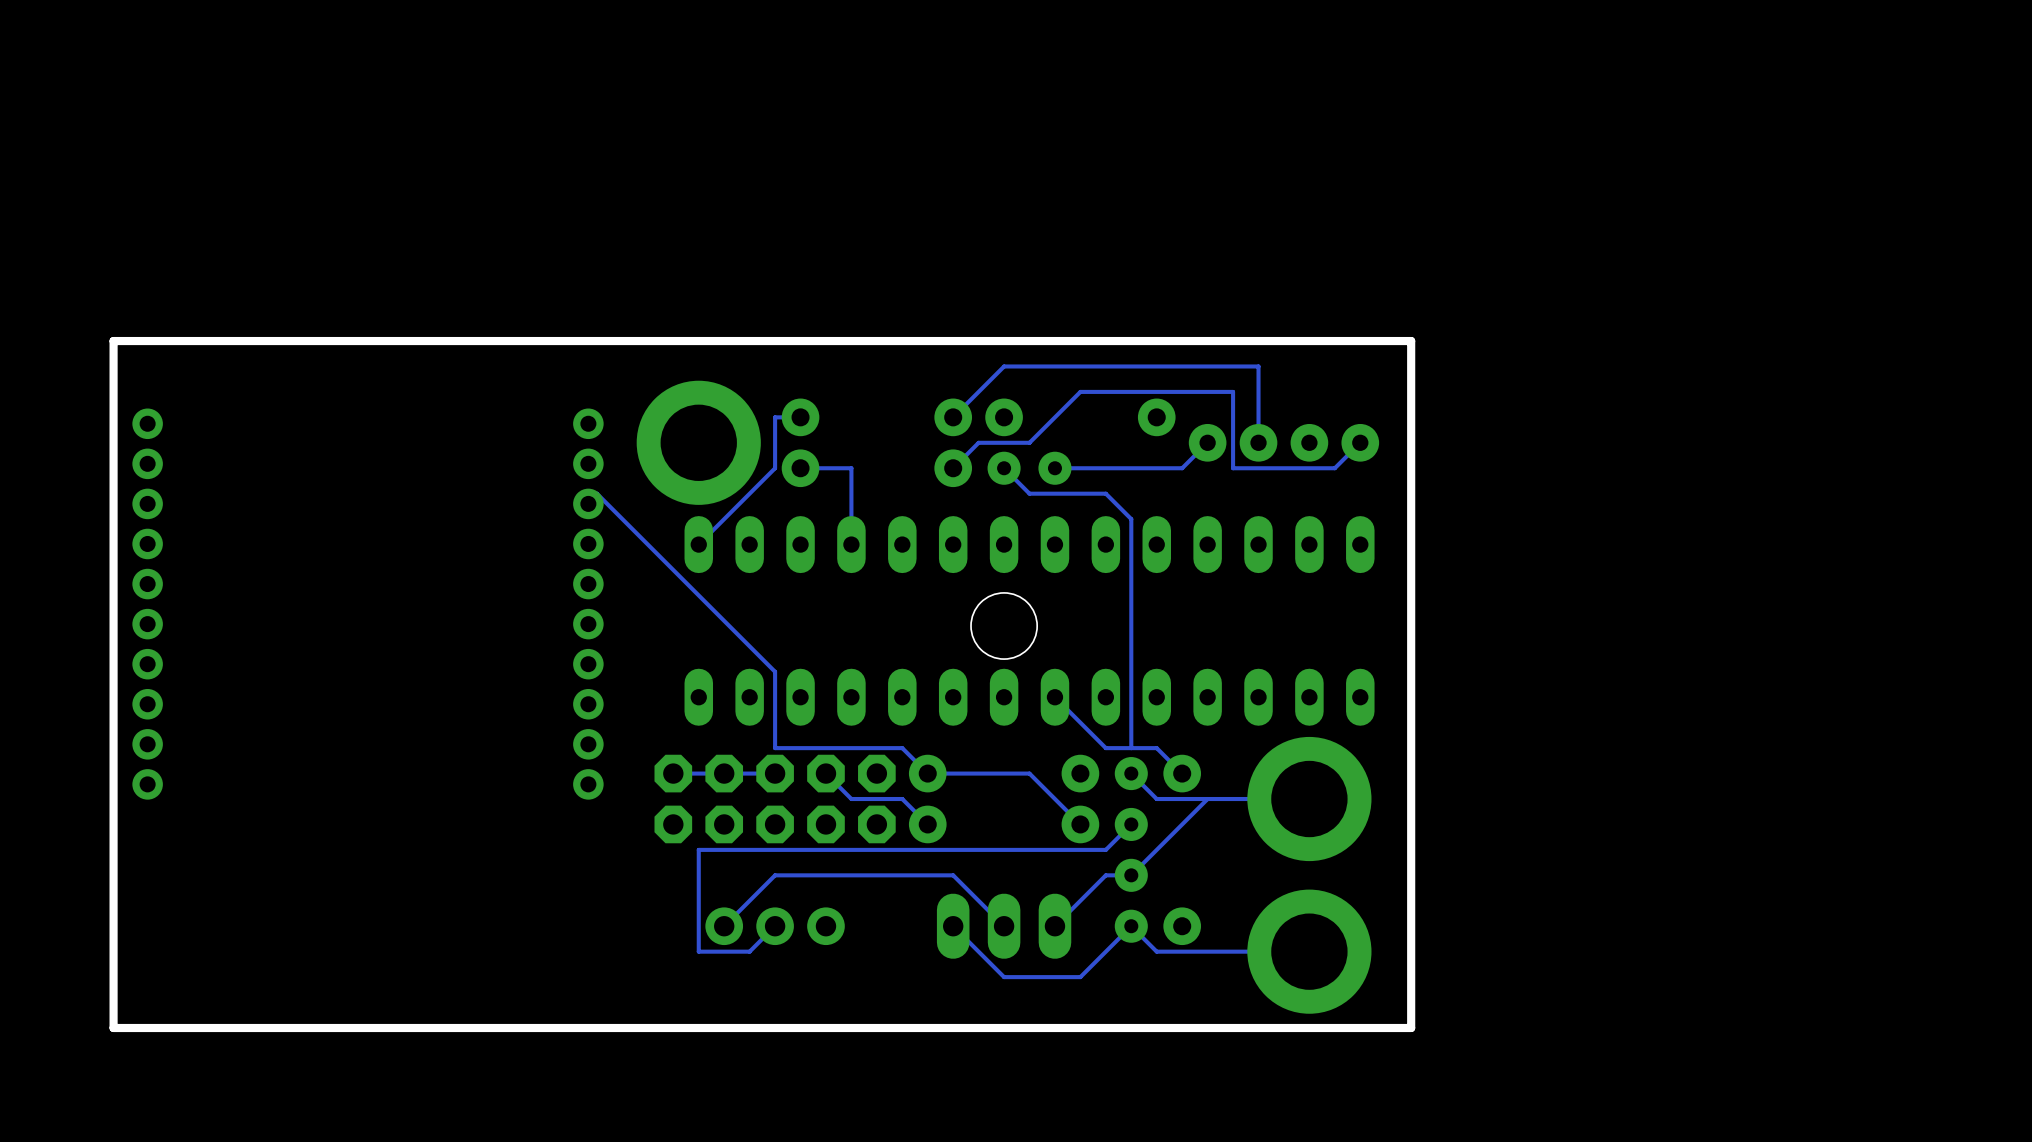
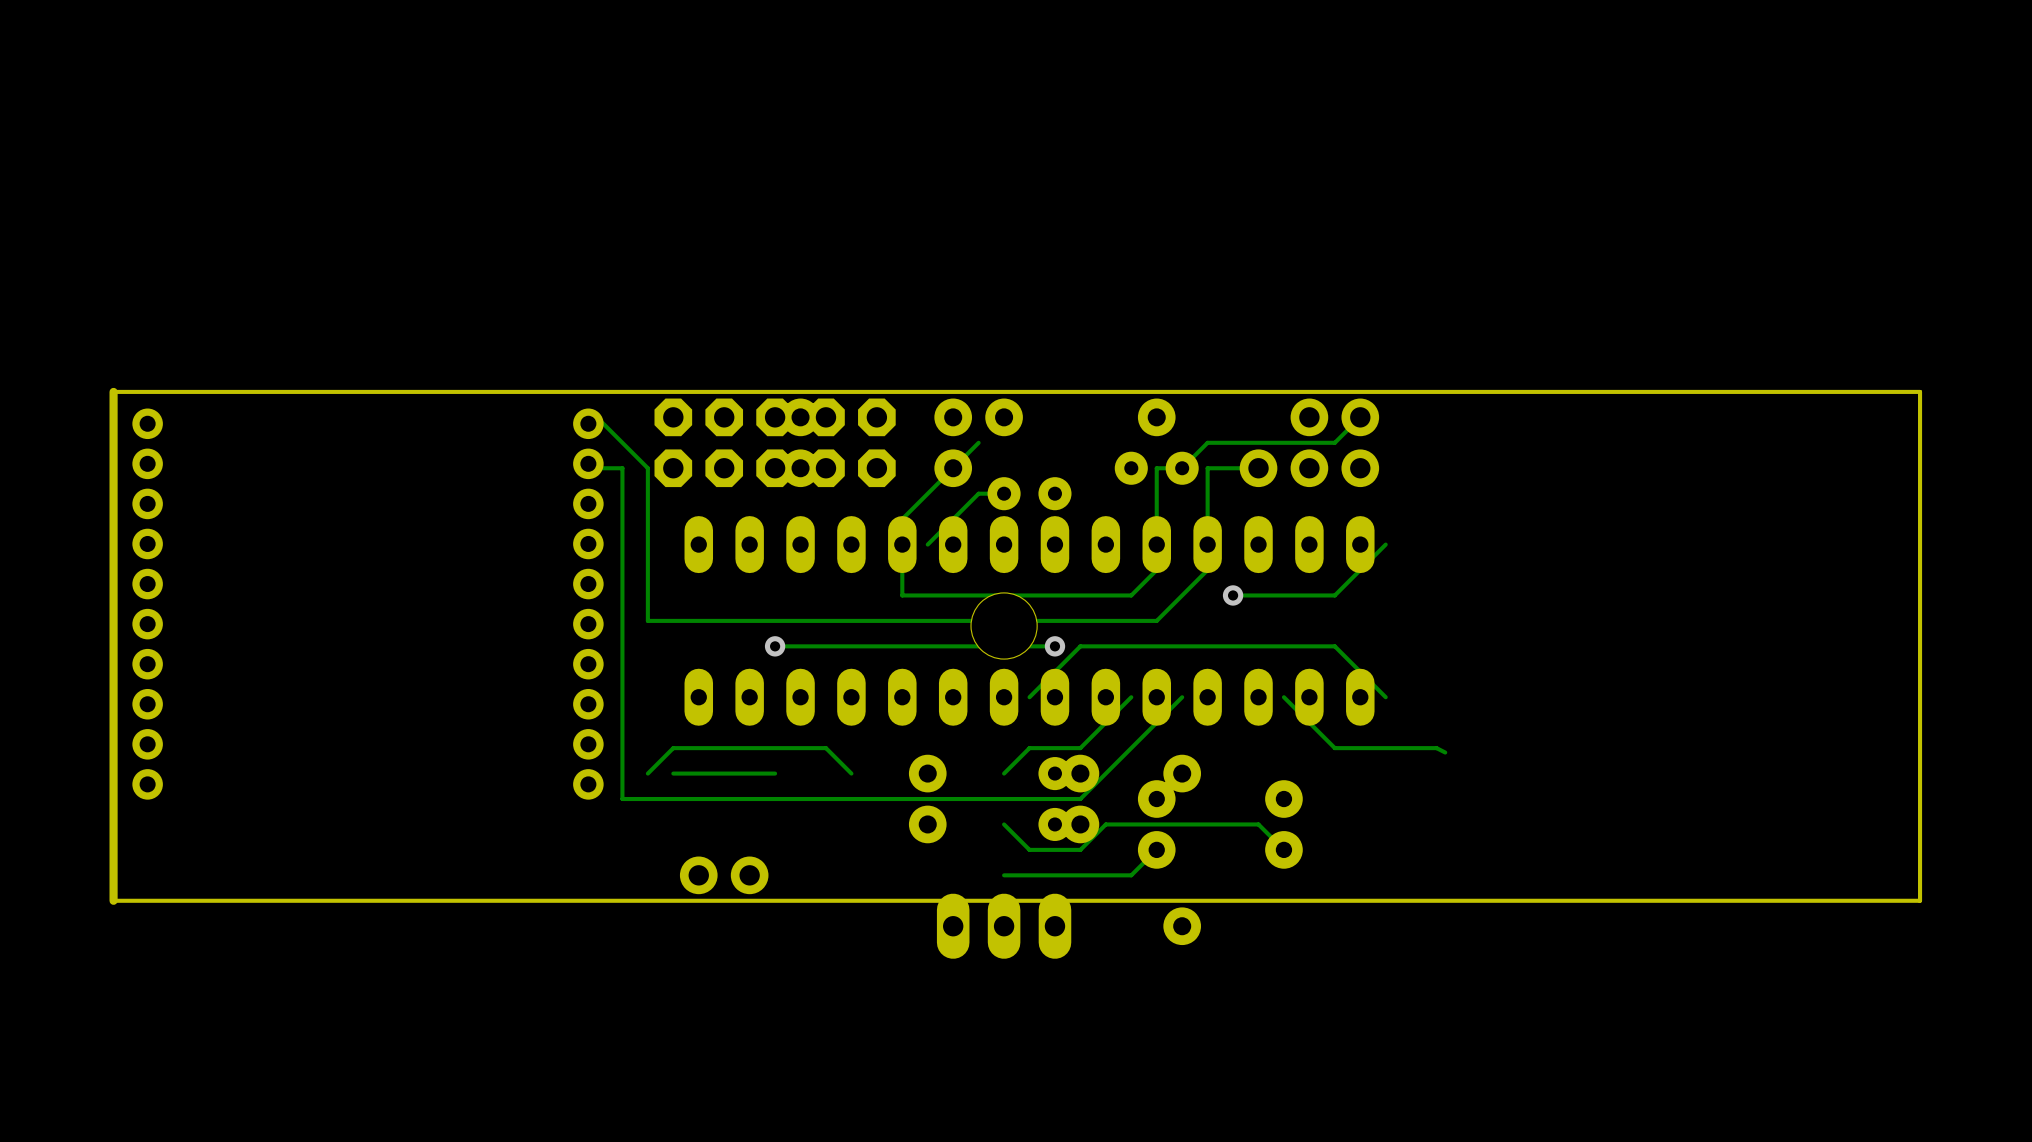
board edge: (113, 391) (113, 341) (1411, 341) (1411, 1028) (113, 1028) (113, 900) -> (113, 391) (1920, 391) (1920, 900) (113, 900)
track: (800, 417) (775, 417) (775, 468) (698, 544) -> none
track: (953, 417) (1004, 366) (1258, 366) (1258, 442) -> none
part: none -> (1309, 417)
track: none -> (1360, 417) (1334, 442) (1207, 442)
part: none -> (1360, 417)
part: (698, 442) -> none
track: (978, 442) (1029, 442) (1080, 391) (1233, 391) (1233, 468) -> (588, 423) (596, 417) (647, 468) (647, 620) (1156, 620) (1207, 570) (1207, 468) (1233, 468)
part: (1233, 442) -> none
part: (1334, 442) -> none
track: (1360, 442) (1334, 468) (1258, 468) -> none
track: (800, 468) (851, 468) (851, 544) -> none
track: (1004, 468) (1029, 493) (1105, 493) (1131, 519) (1131, 748) -> none
part position: (1029, 468) -> (1029, 493)
track: (1156, 468) (1054, 468) -> (1156, 468) (1156, 570) (1131, 595) (902, 595) (902, 519) (953, 468)
part: none -> (1156, 468)
part: none -> (1309, 468)
track: none -> (1004, 493) (978, 493) (927, 544)
track: (588, 503) (596, 493) (775, 671) (775, 748) -> (647, 773) (673, 748) (775, 748)
track: none -> (1385, 544) (1334, 595) (1233, 595)
via: none -> (1233, 595)
via: none -> (775, 646)
track: none -> (1054, 646) (775, 646)
via: none -> (1054, 646)
track: (1054, 697) (1105, 748) (1156, 748) (1182, 773) -> none
track: none -> (1131, 697) (1080, 748) (1029, 748) (1004, 773)
track: none -> (1283, 697) (1334, 748) (1436, 748) (1445, 752)
track: none -> (1385, 697) (1334, 646) (1080, 646) (1029, 697)
track: (825, 748) (902, 748) (927, 773) (1029, 773) (1080, 824) -> (825, 748) (851, 773)
track: (825, 773) (851, 799) -> (588, 463) (596, 468) (622, 468) (622, 799) (851, 799)
track: (1131, 773) (1156, 799) (1309, 799) -> none
part position: (775, 799) -> (775, 442)
track: (902, 799) (927, 824) -> (902, 799) (1080, 799) (1182, 697)
part: none -> (1054, 799)
part: (1131, 799) -> none
track: (1207, 799) (1156, 849) -> none
part: (1309, 799) -> none
track: (1131, 824) (1105, 849) (1080, 849) -> (1283, 849) (1258, 824) (1105, 824) (1080, 849)
part: none -> (1156, 824)
part: none -> (1283, 824)
track: (1029, 849) (698, 849) (698, 951) (749, 951) (775, 926) -> (1029, 849) (1004, 824)
part: none -> (698, 875)
part: none -> (749, 875)
track: (1105, 875) (1054, 926) -> (1105, 875) (1004, 875)
part: (1131, 900) -> none
part: (775, 926) -> none
track: (953, 926) (1004, 977) (1080, 977) (1131, 926) (1156, 951) (1309, 951) -> none
track: (1004, 926) (953, 875) (775, 875) (724, 926) -> none
part: (1309, 951) -> none

